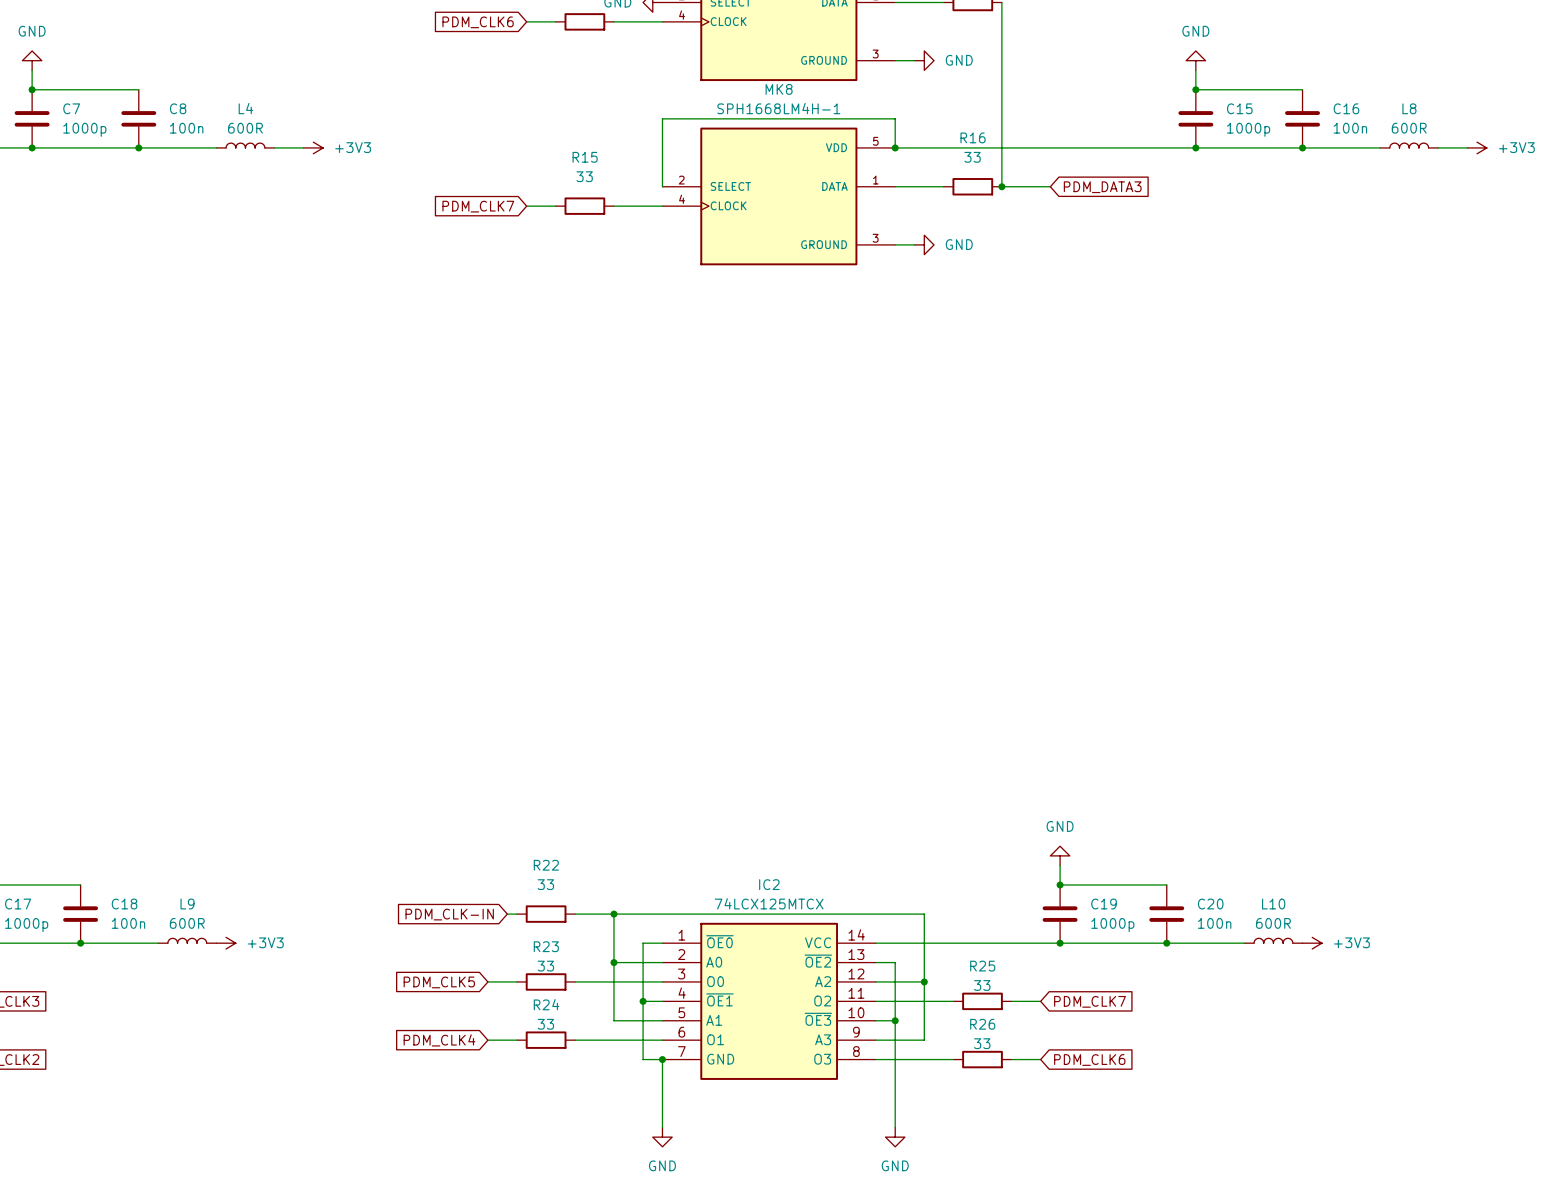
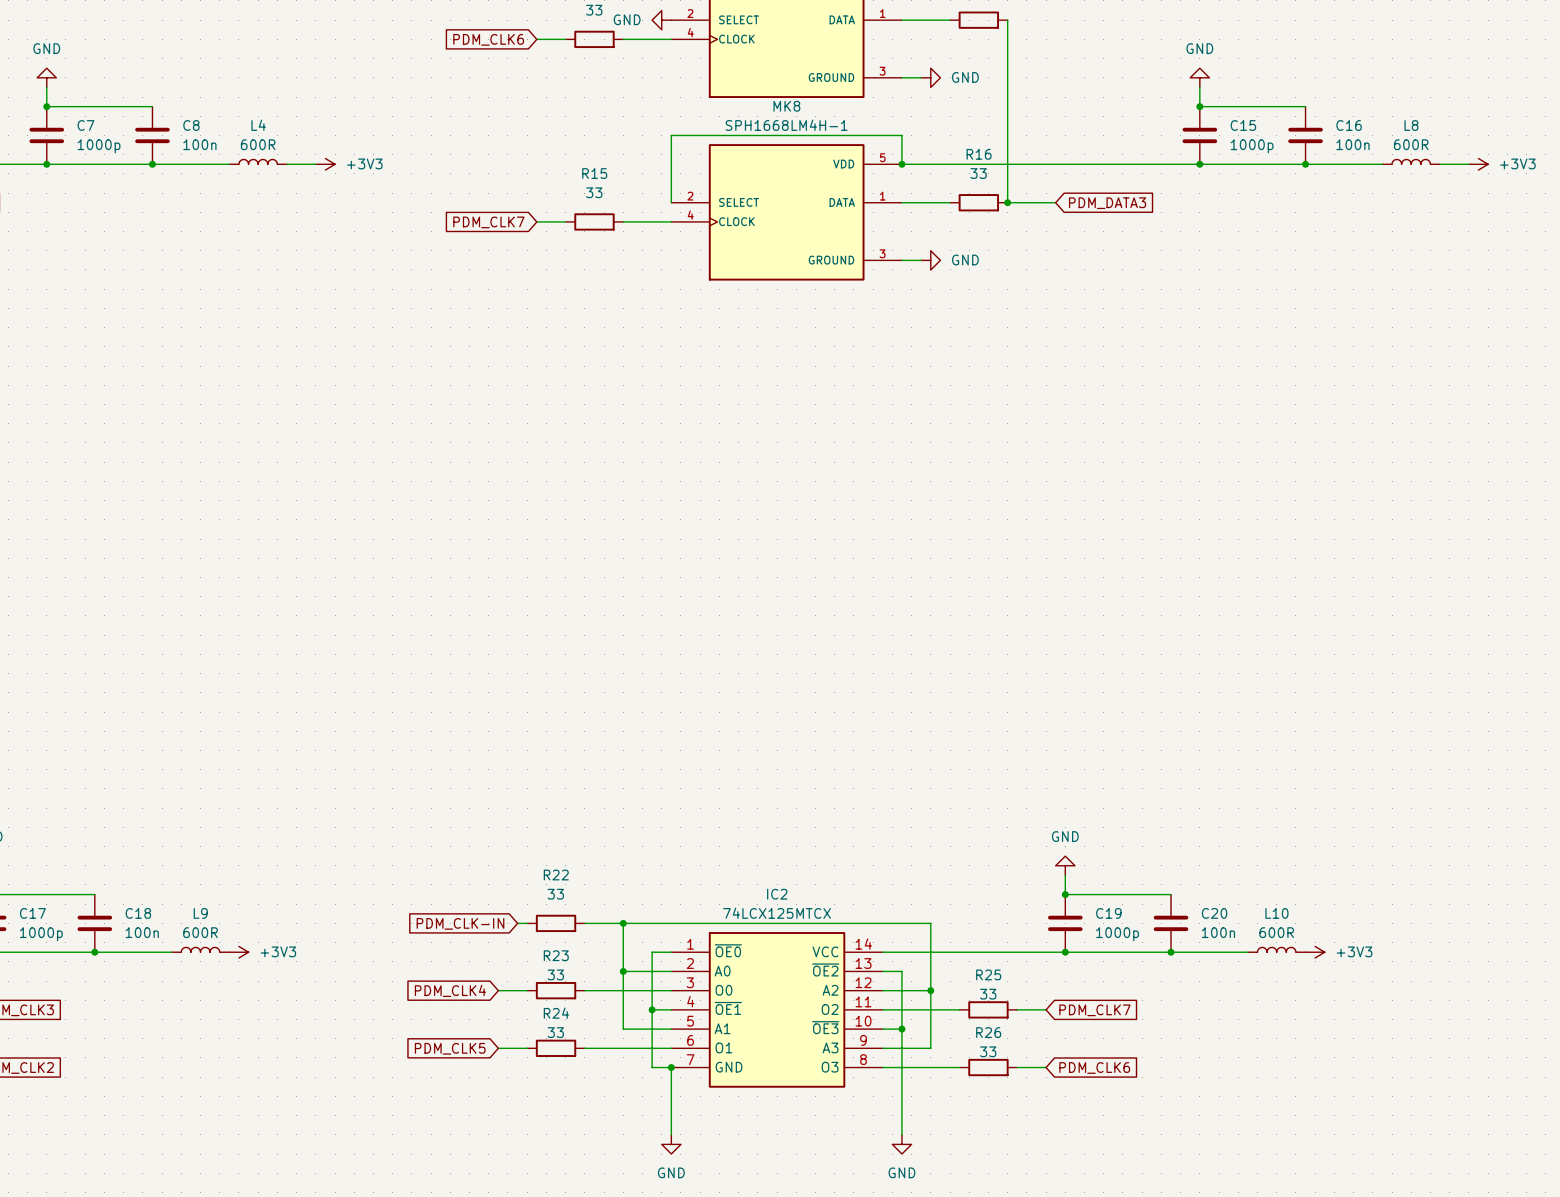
global label: PDM_CLK5 (439, 982) -> PDM_CLK4 (450, 990)
global label: PDM_CLK4 (439, 1040) -> PDM_CLK5 (450, 1048)

